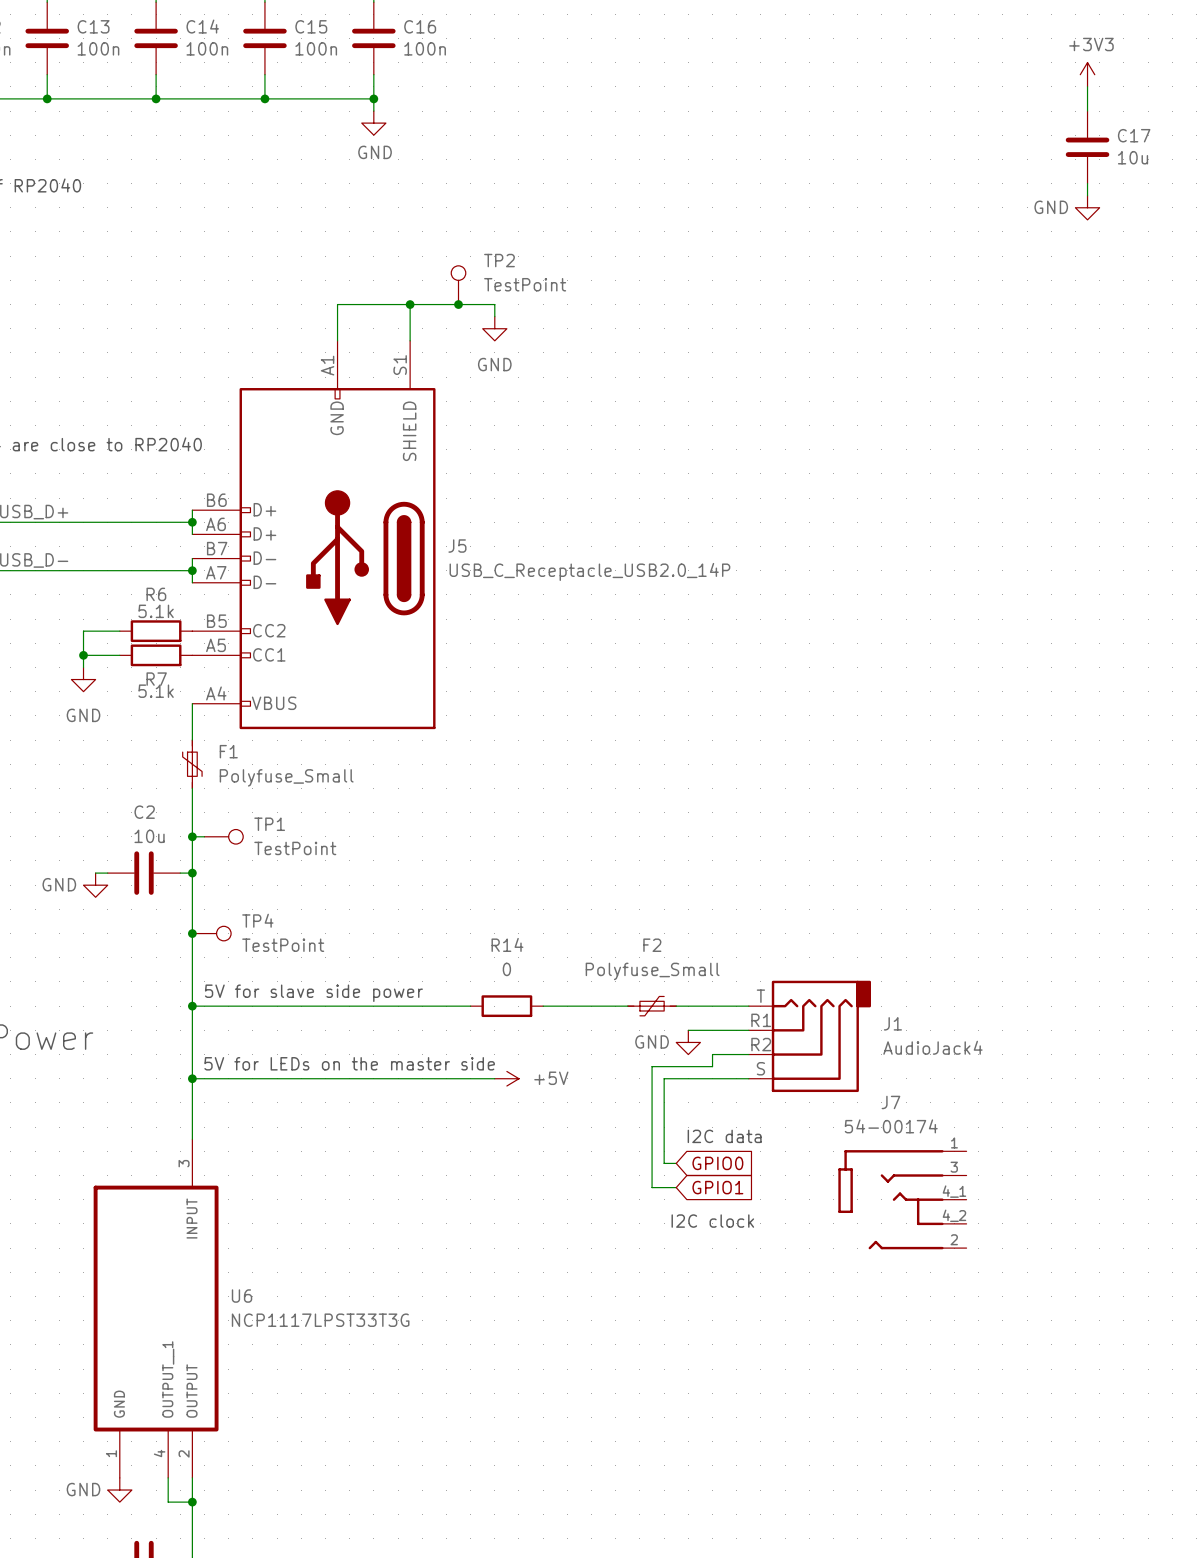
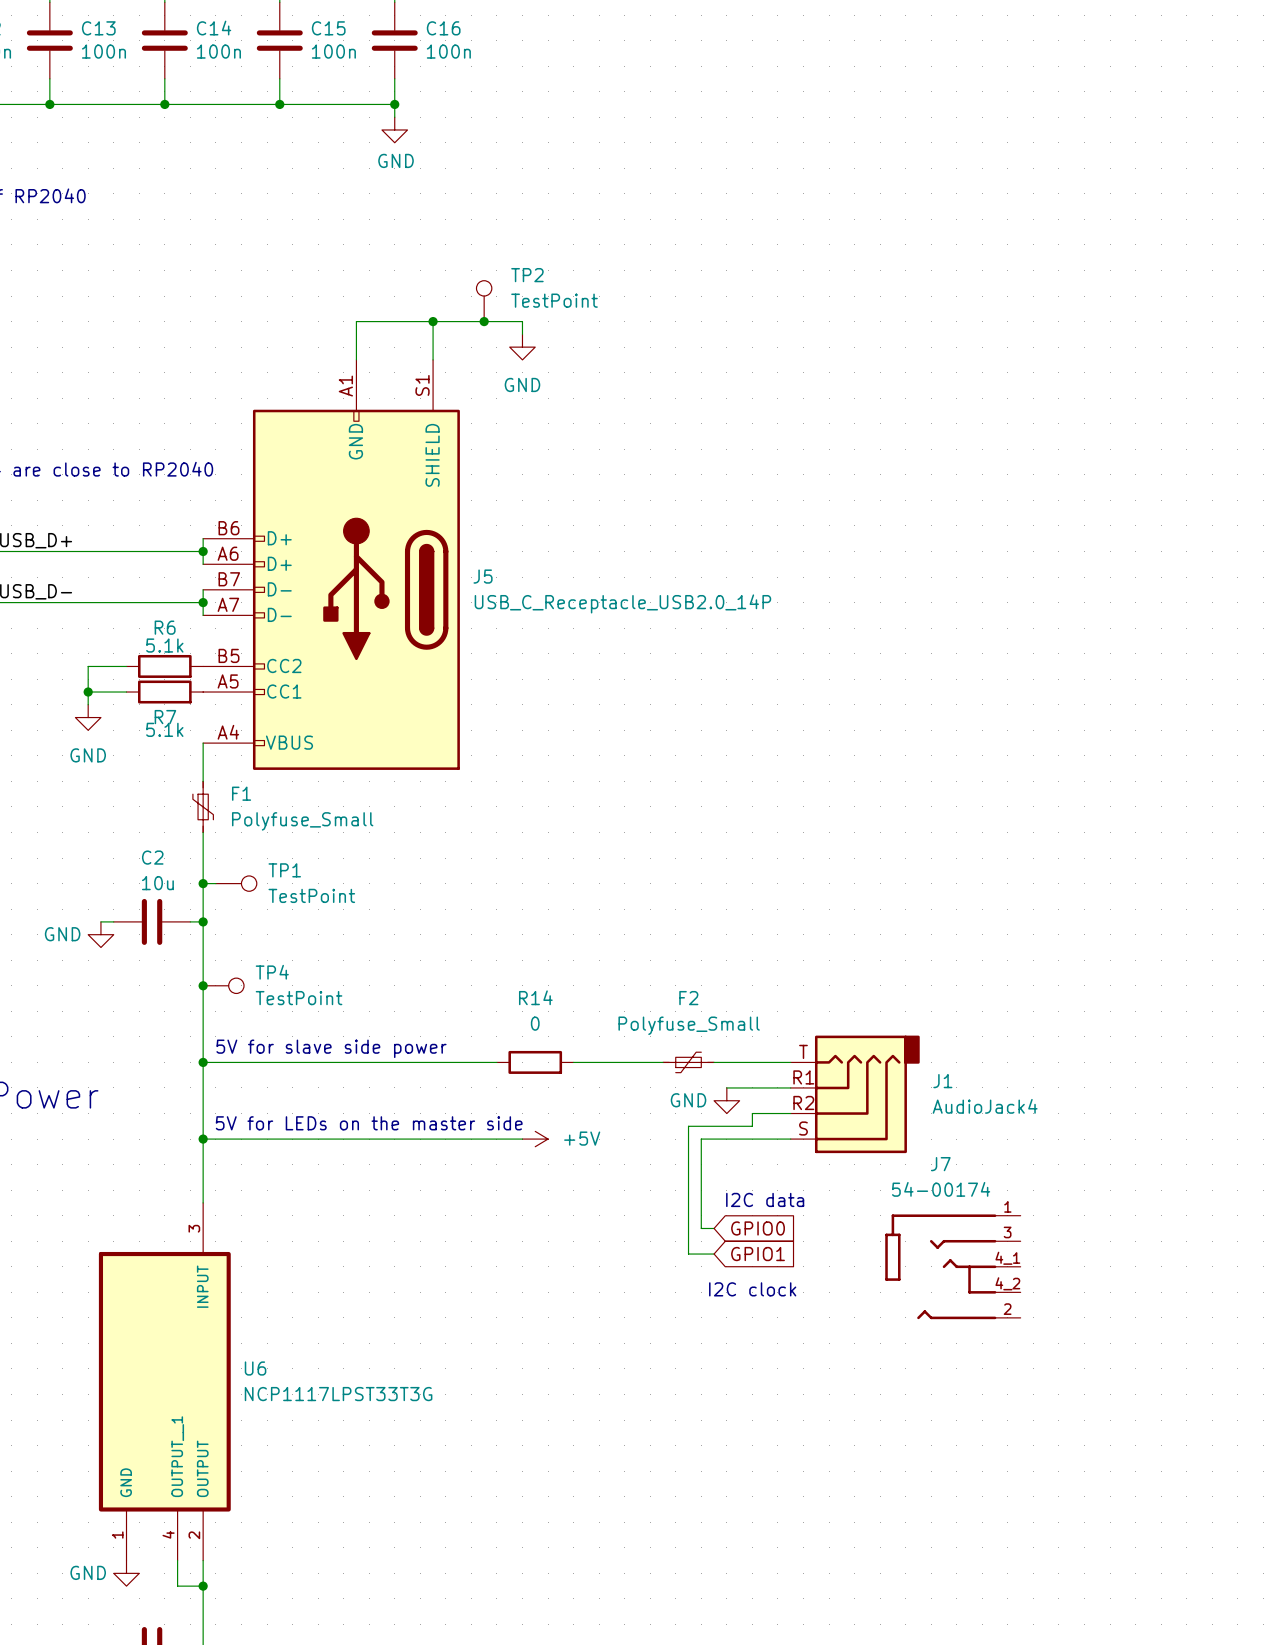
power symbol: +3V3 (1087, 74) -> none
wire: (1087, 86) (1087, 111) -> none
C17: 10u (1087, 147) -> none
wire: (1087, 183) (1087, 195) -> none
power symbol: GND (1087, 207) -> none

